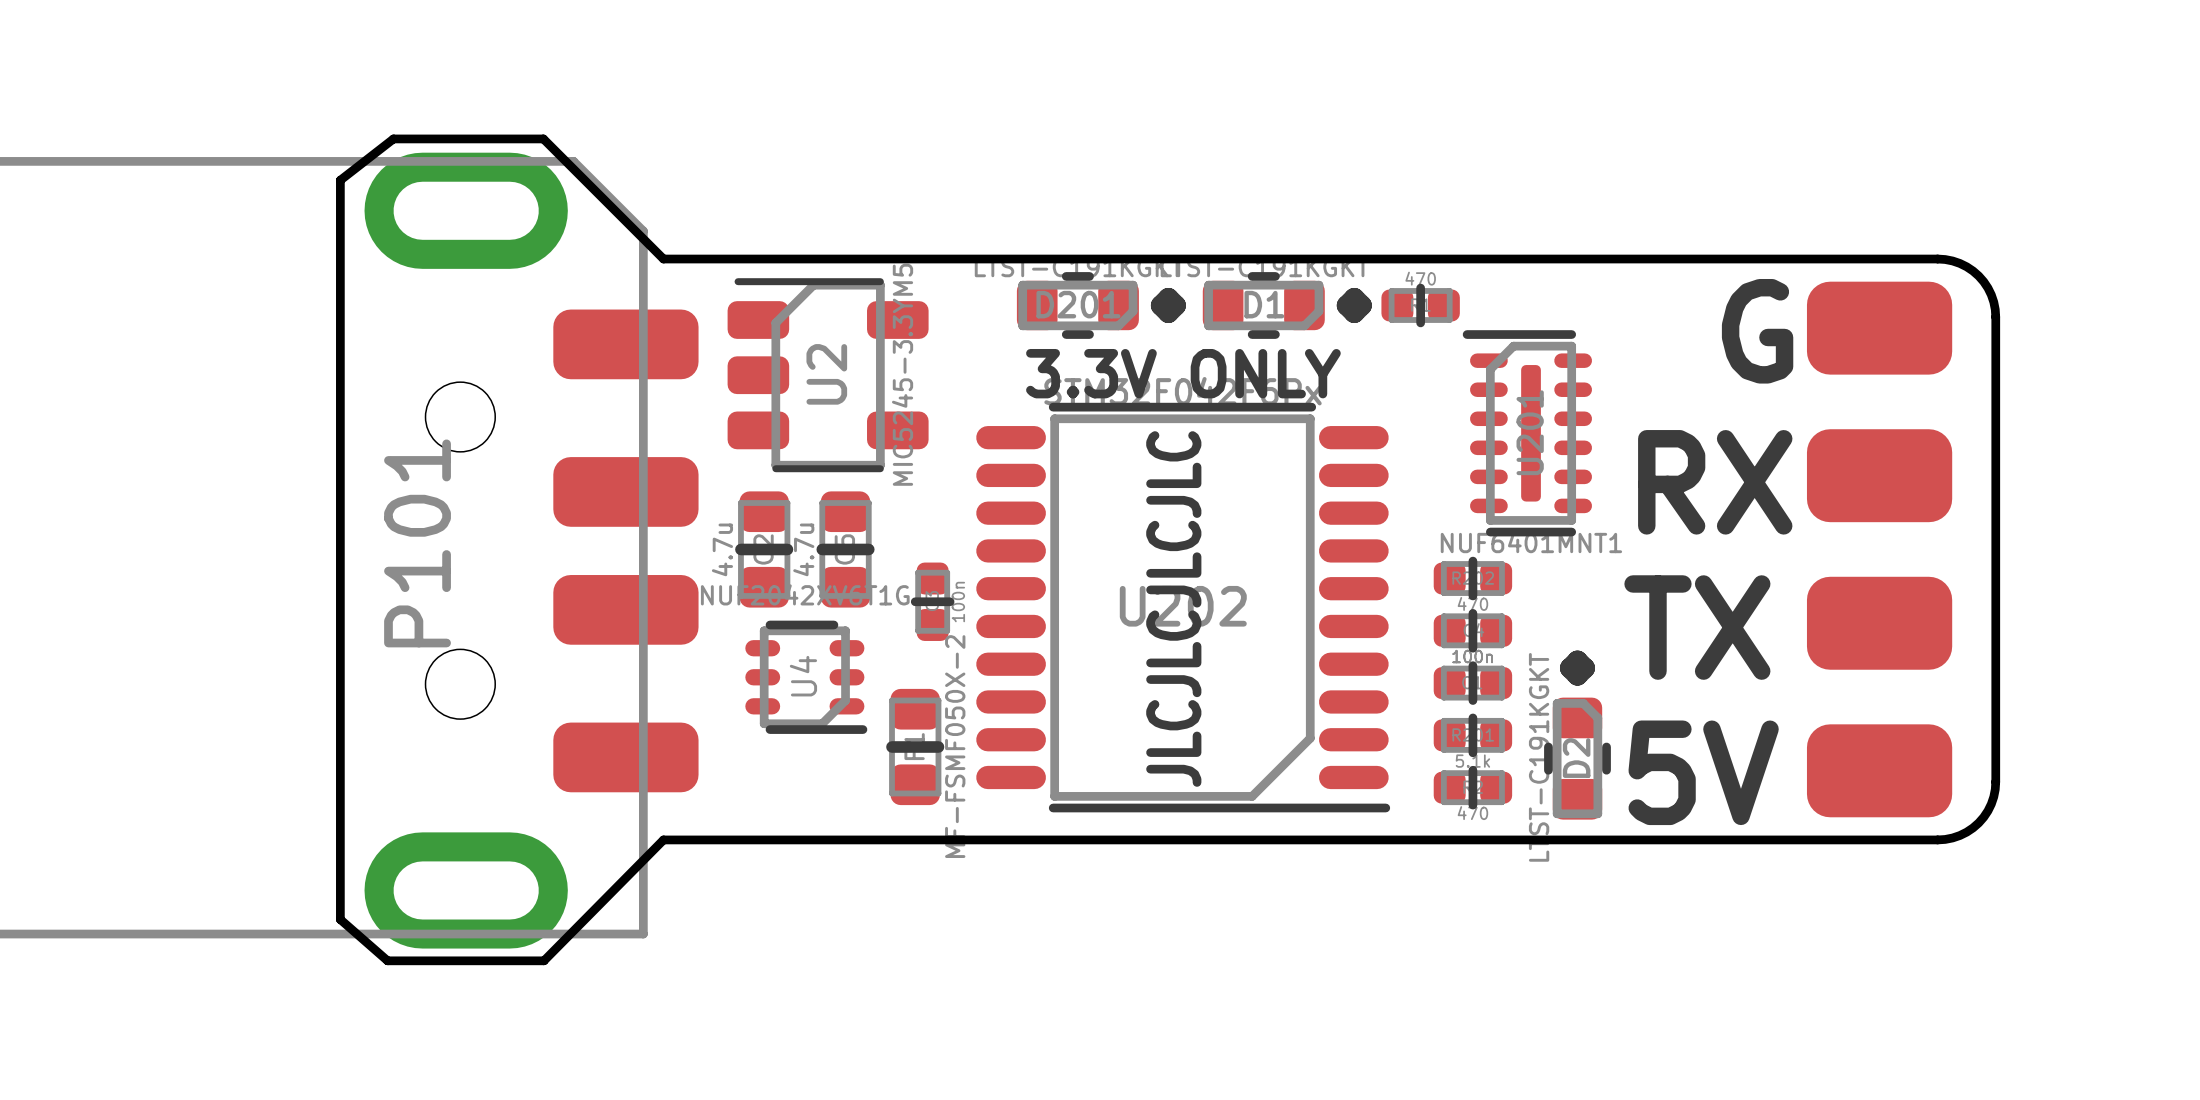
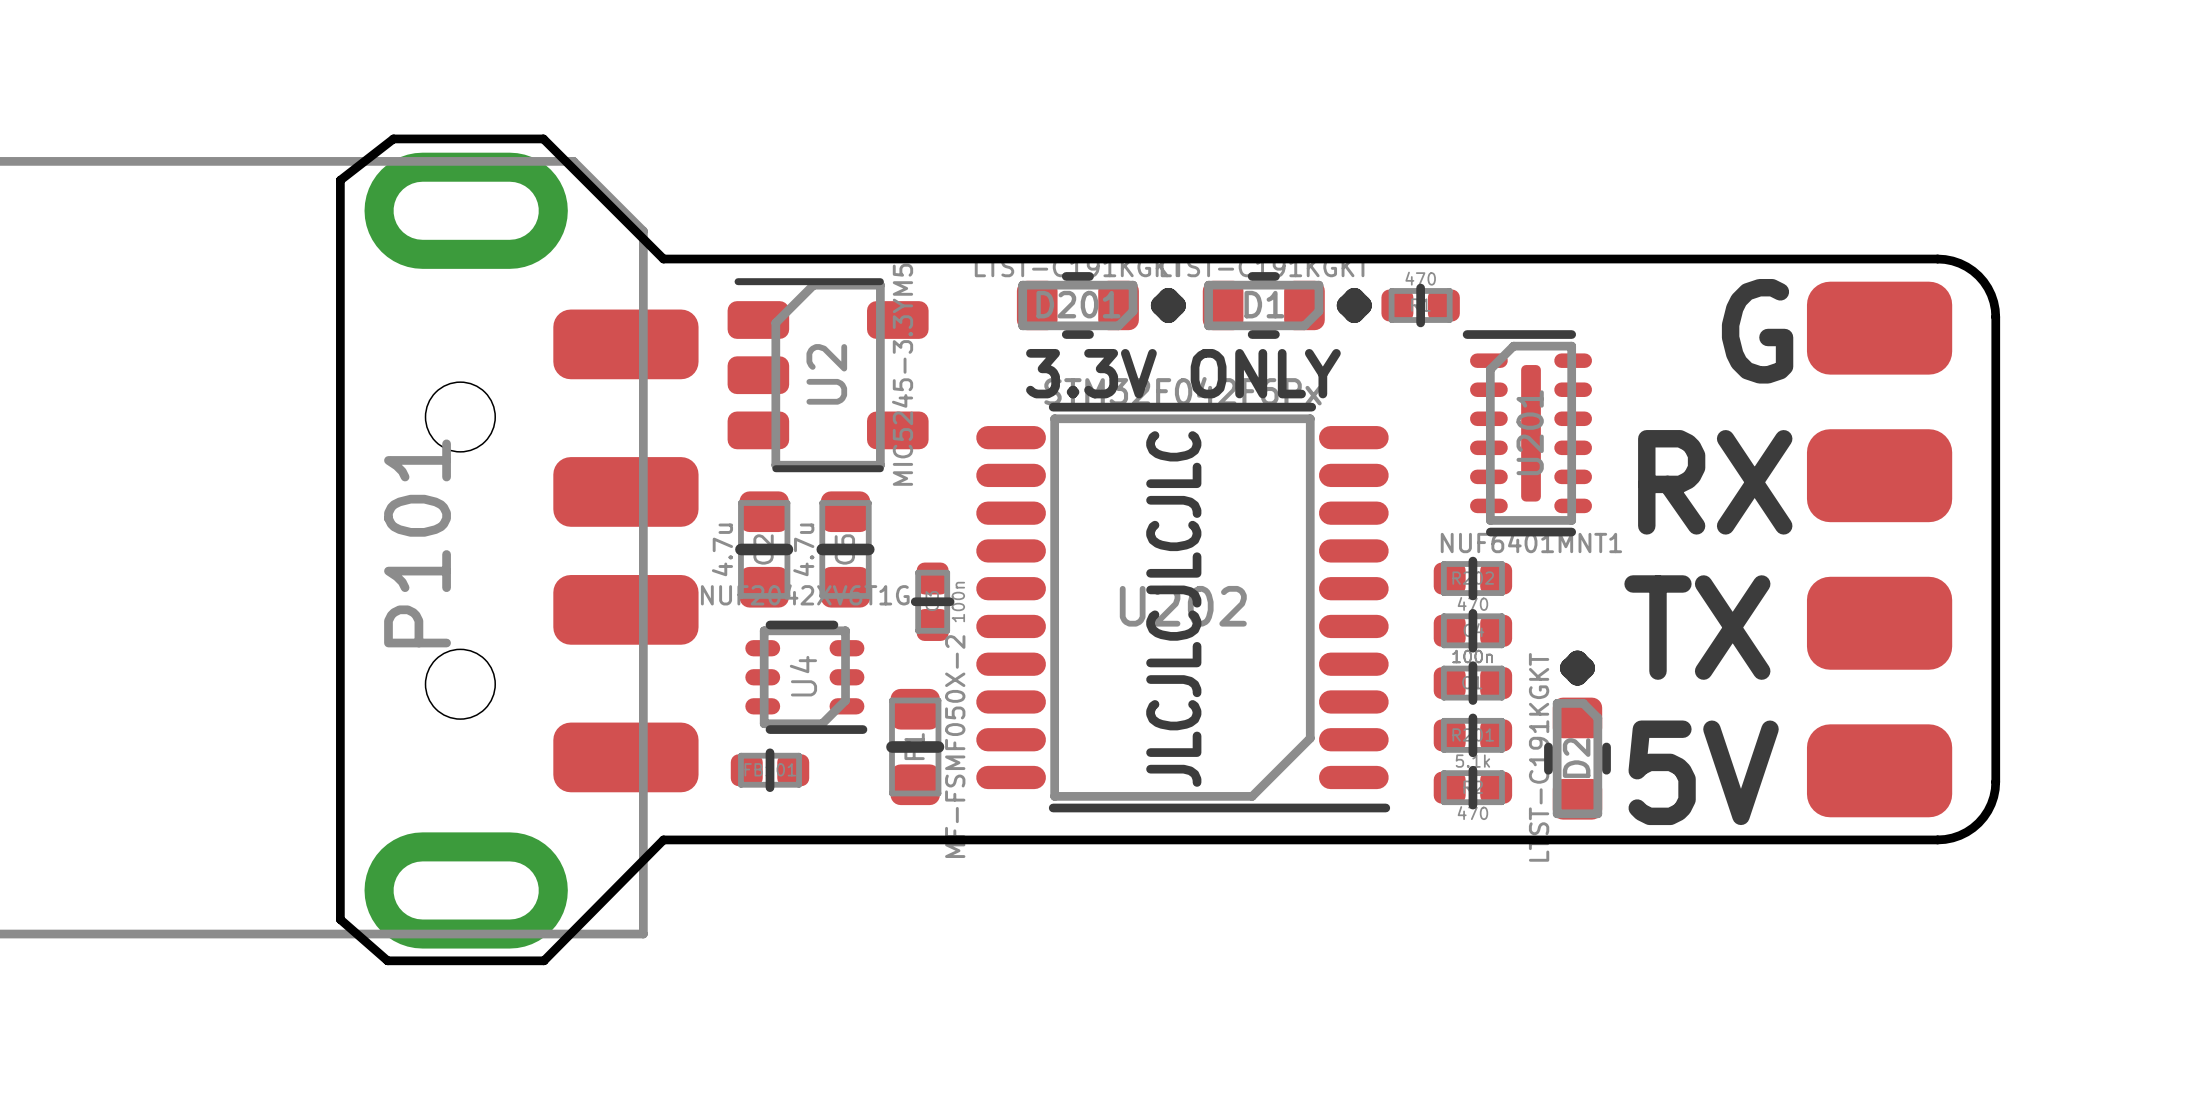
part: none -> (770, 770)

